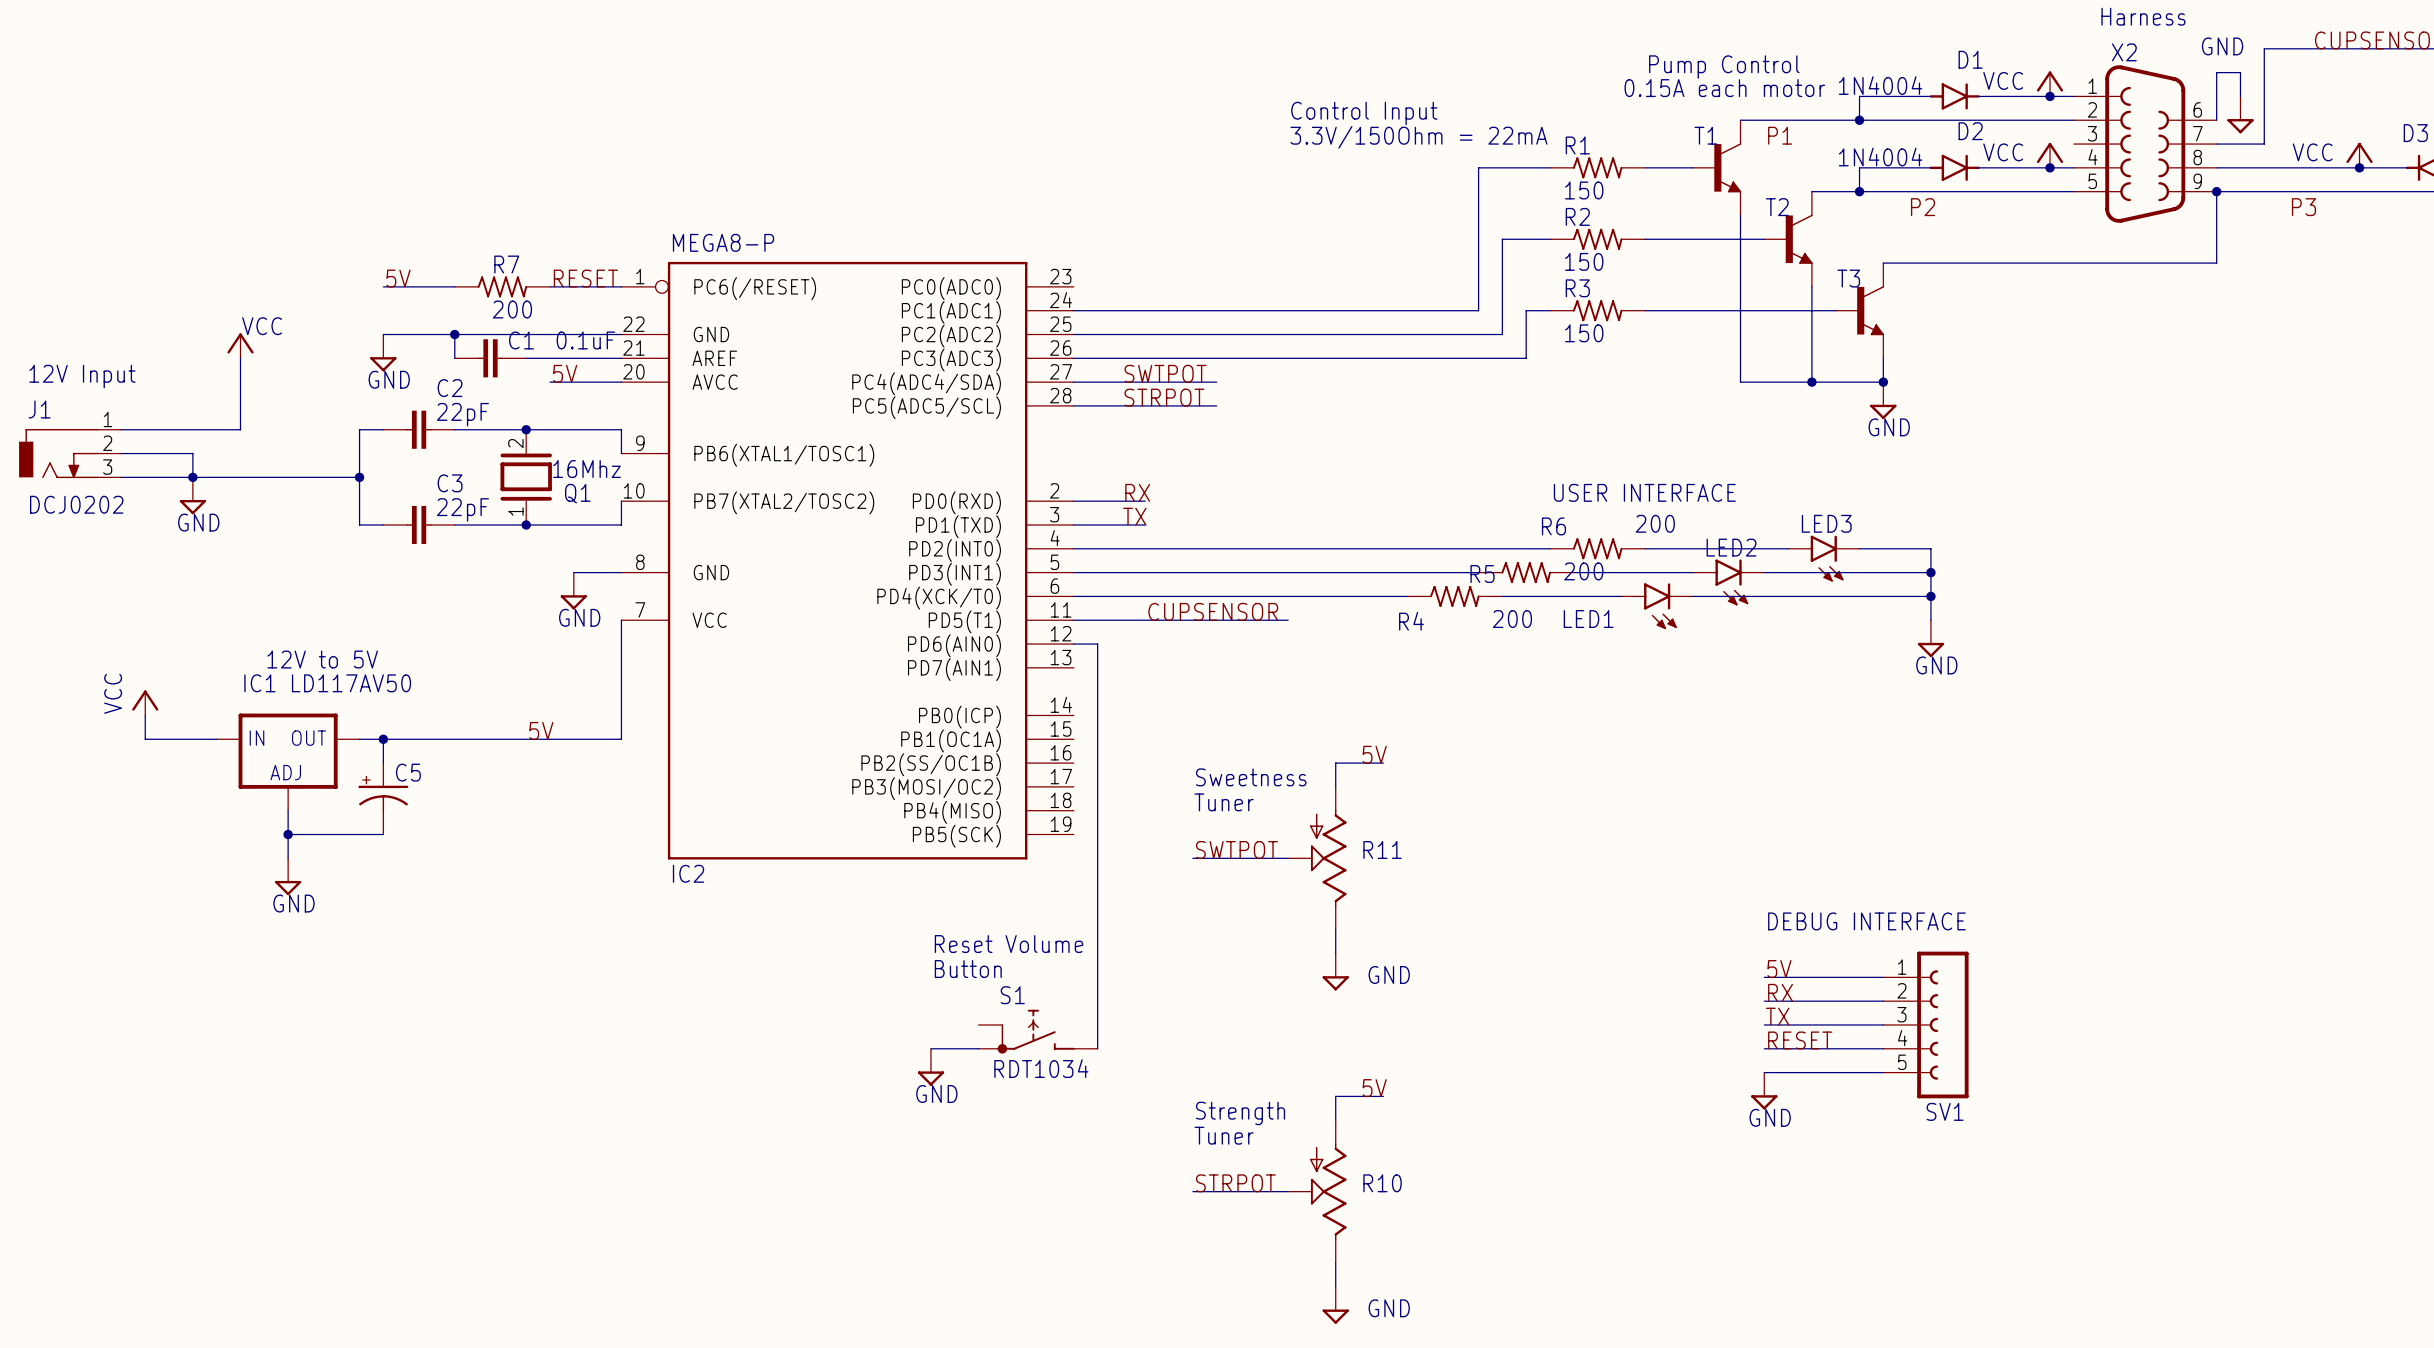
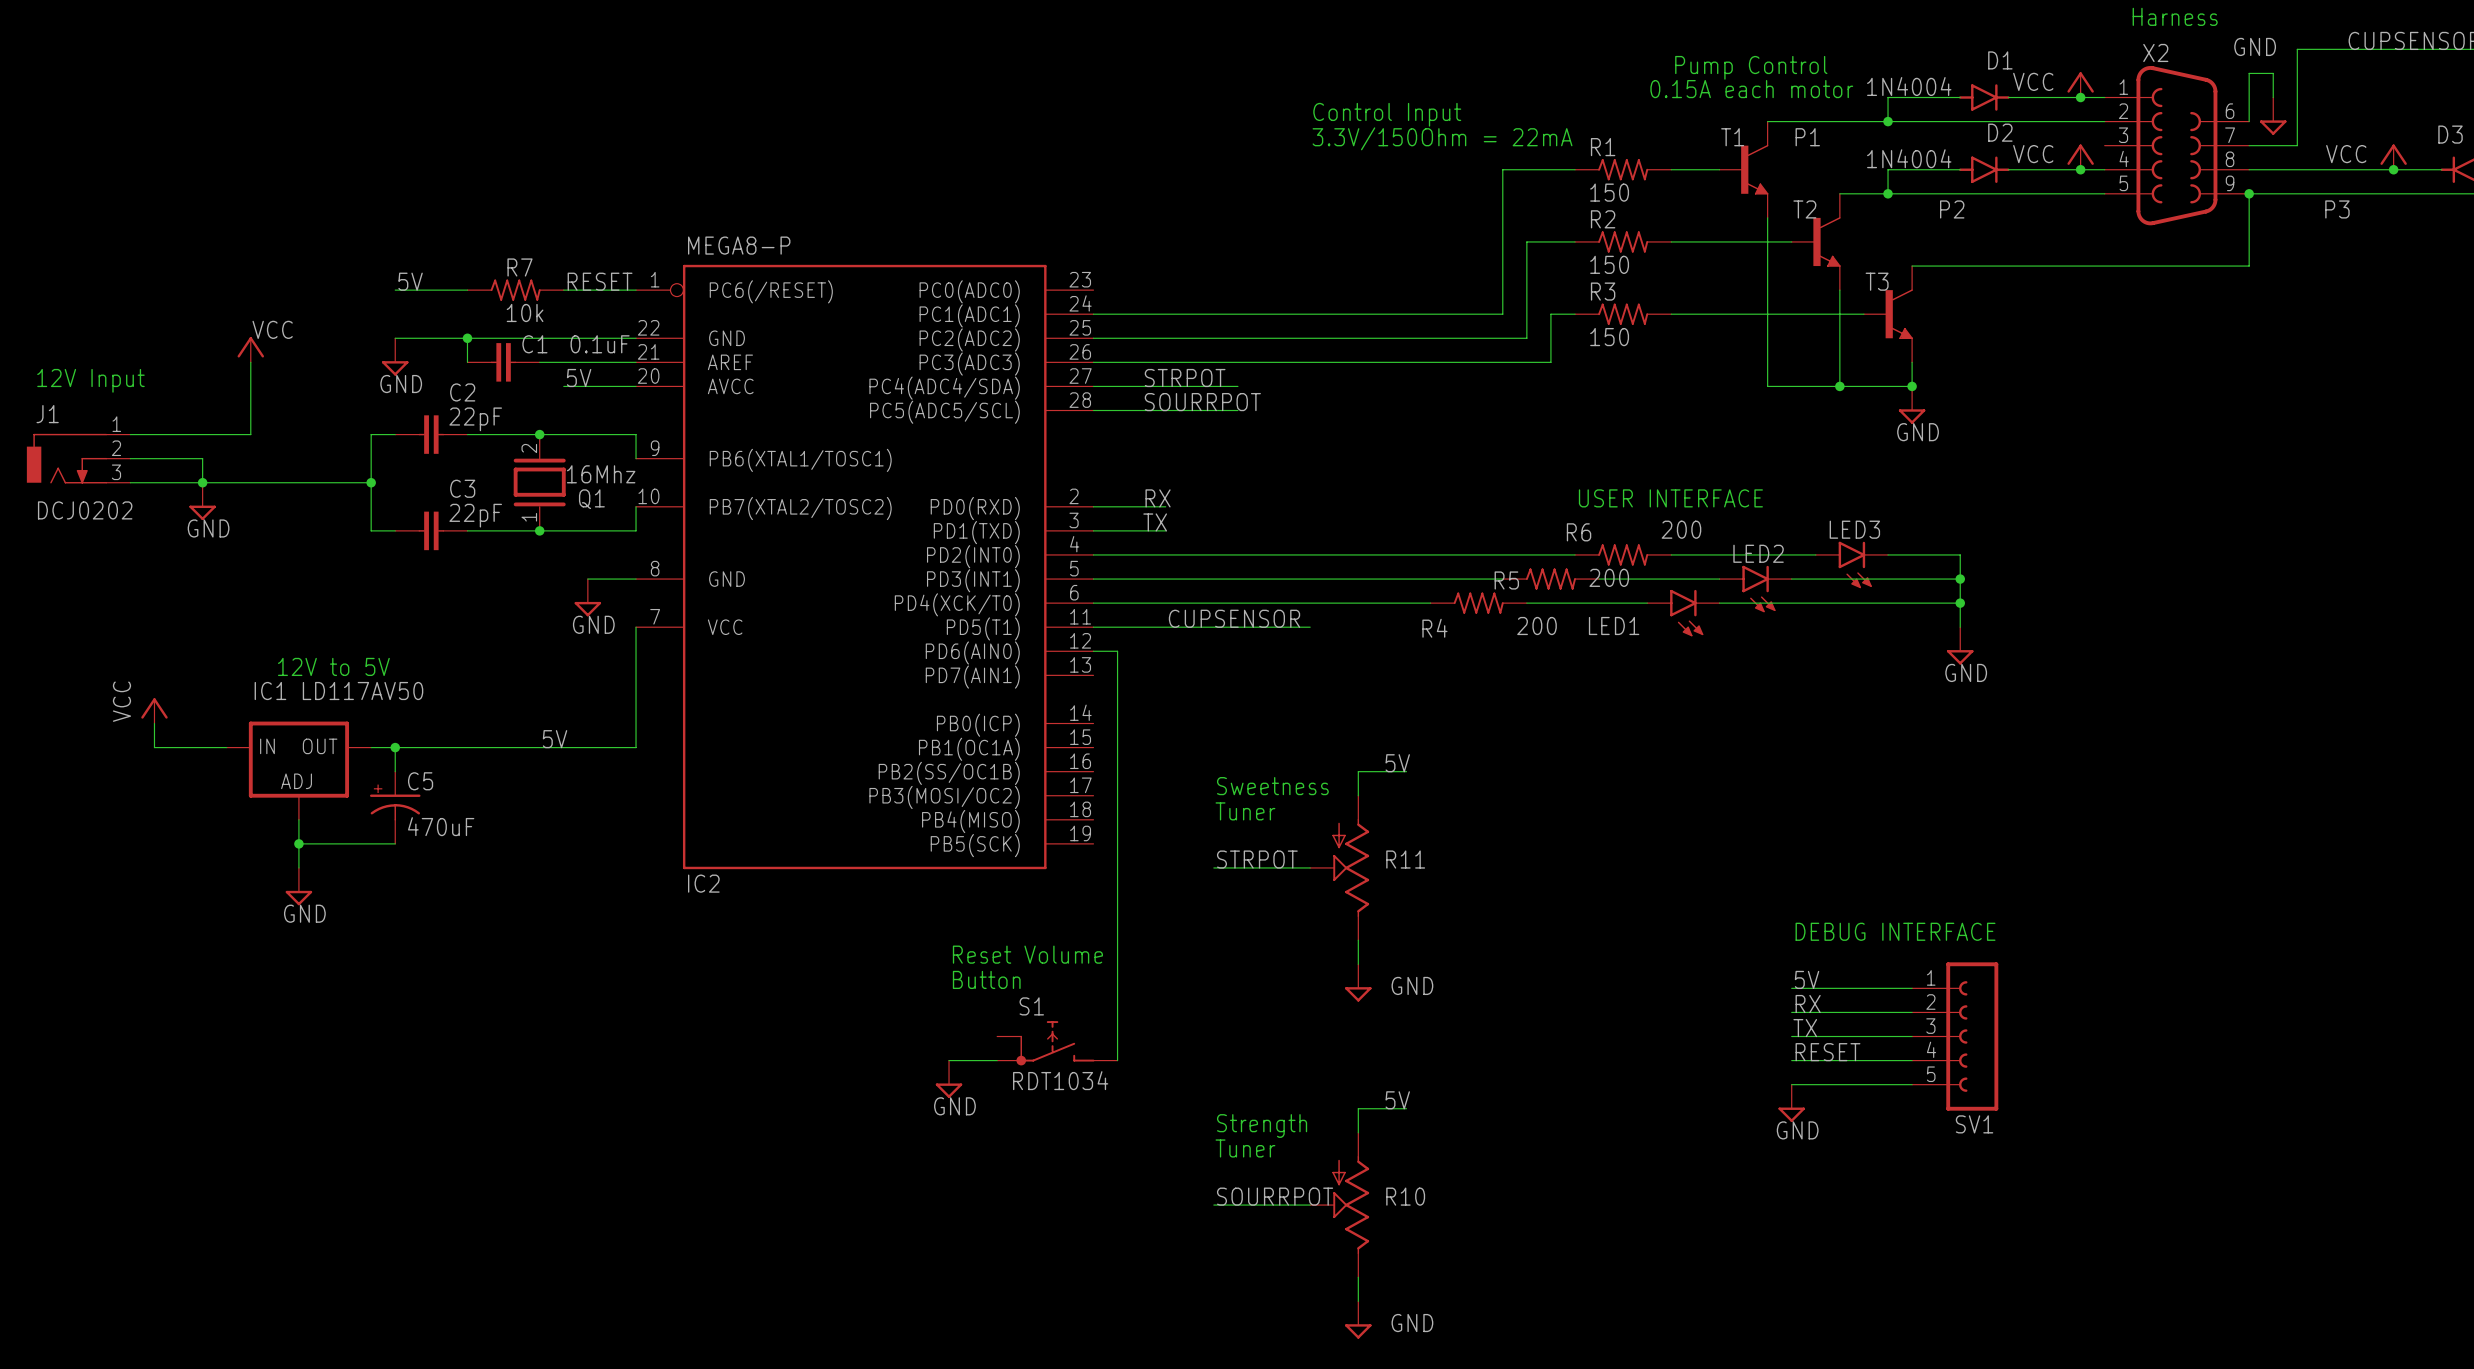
R7 value: 200 (512, 309) -> 10k (525, 312)
label: SWTPOT (1165, 373) -> STRPOT (1185, 378)
label: STRPOT (1164, 397) -> SOURRPOT (1202, 402)
C5 value: none -> 470uF (441, 826)
label: SWTPOT (1236, 849) -> STRPOT (1257, 859)
label: STRPOT (1235, 1183) -> SOURRPOT (1275, 1196)

